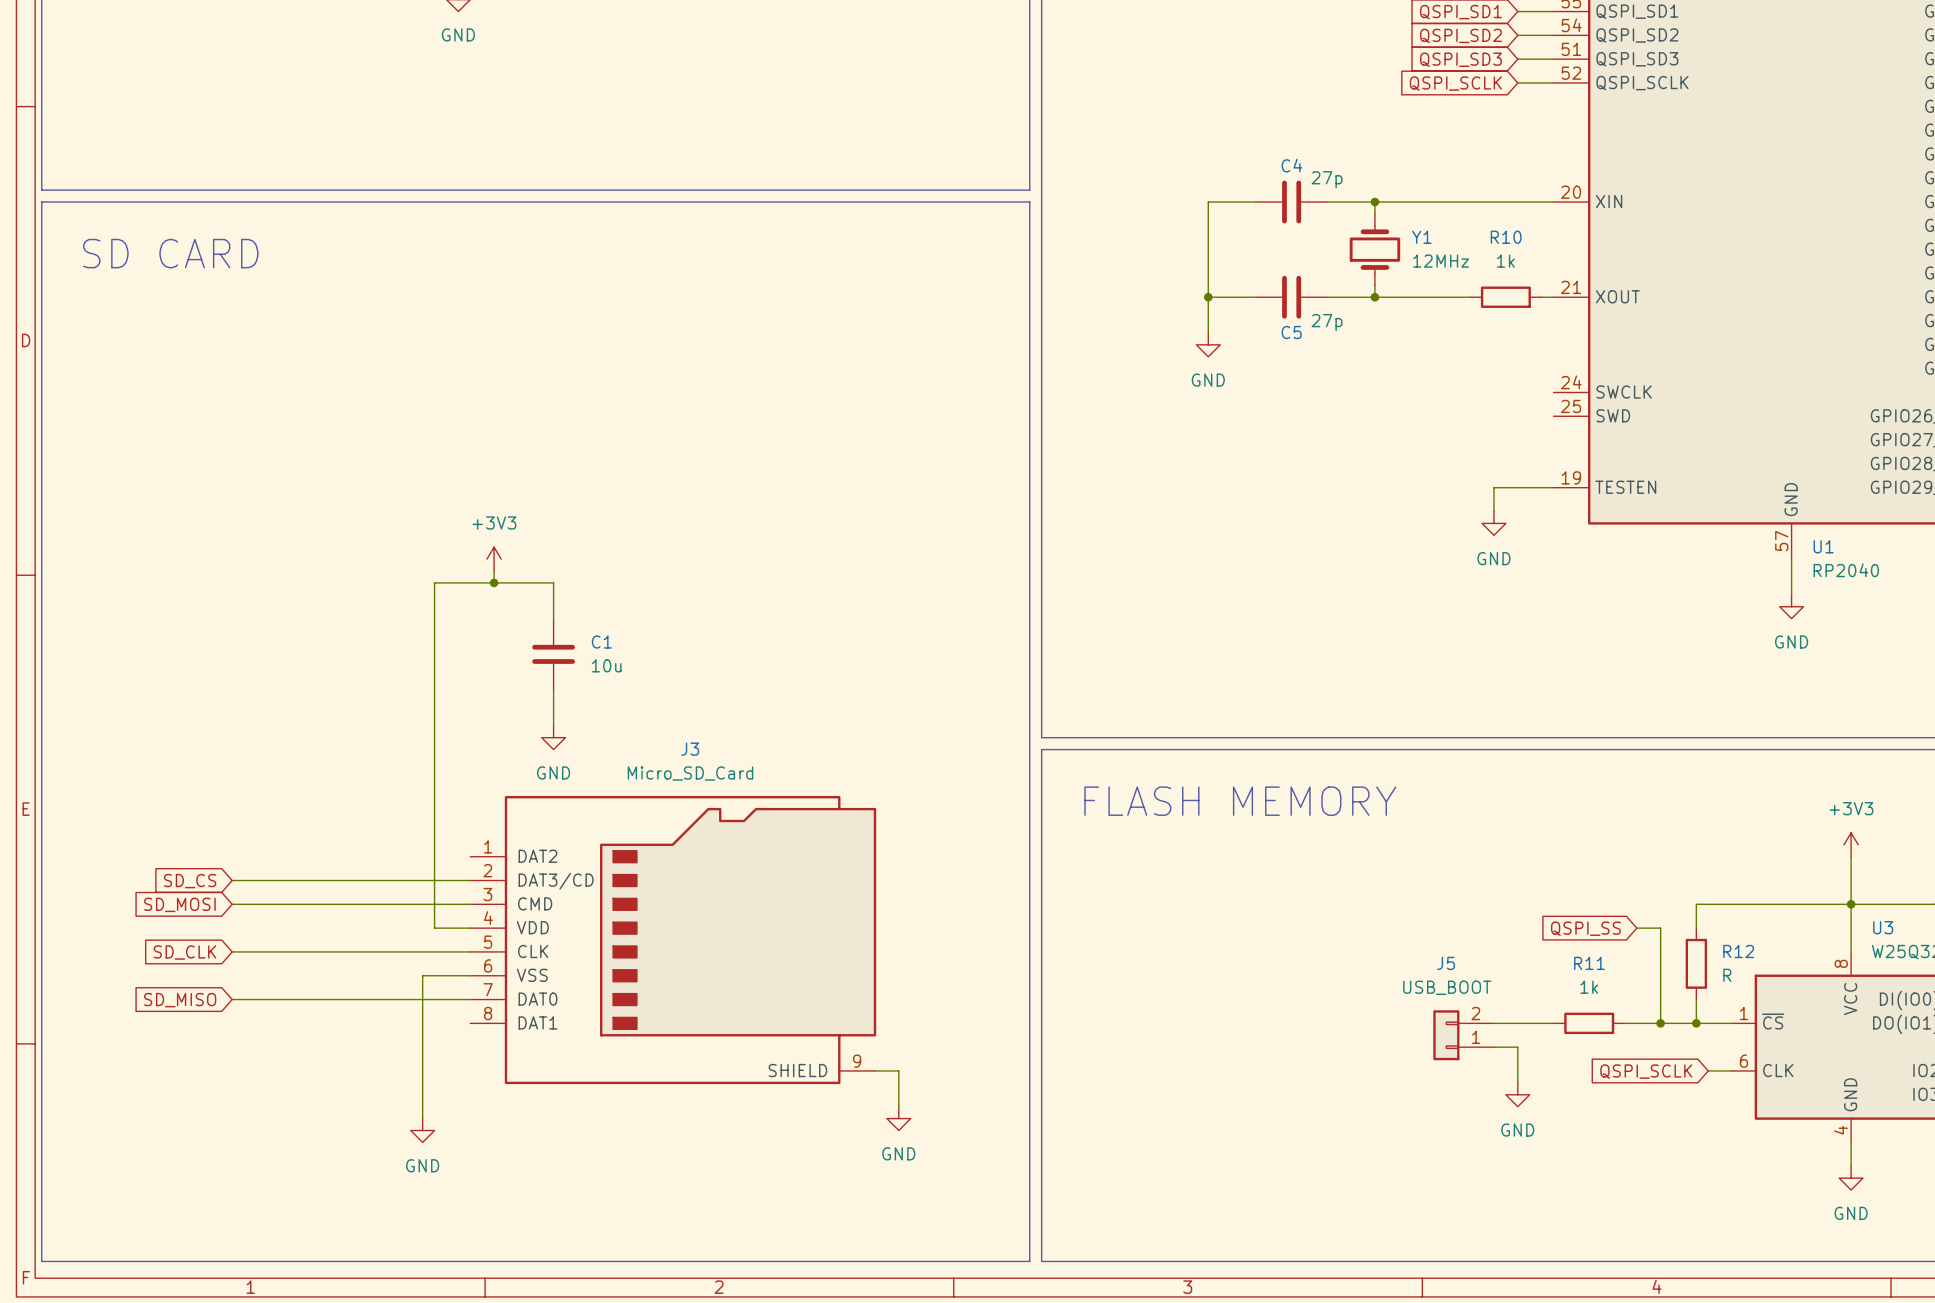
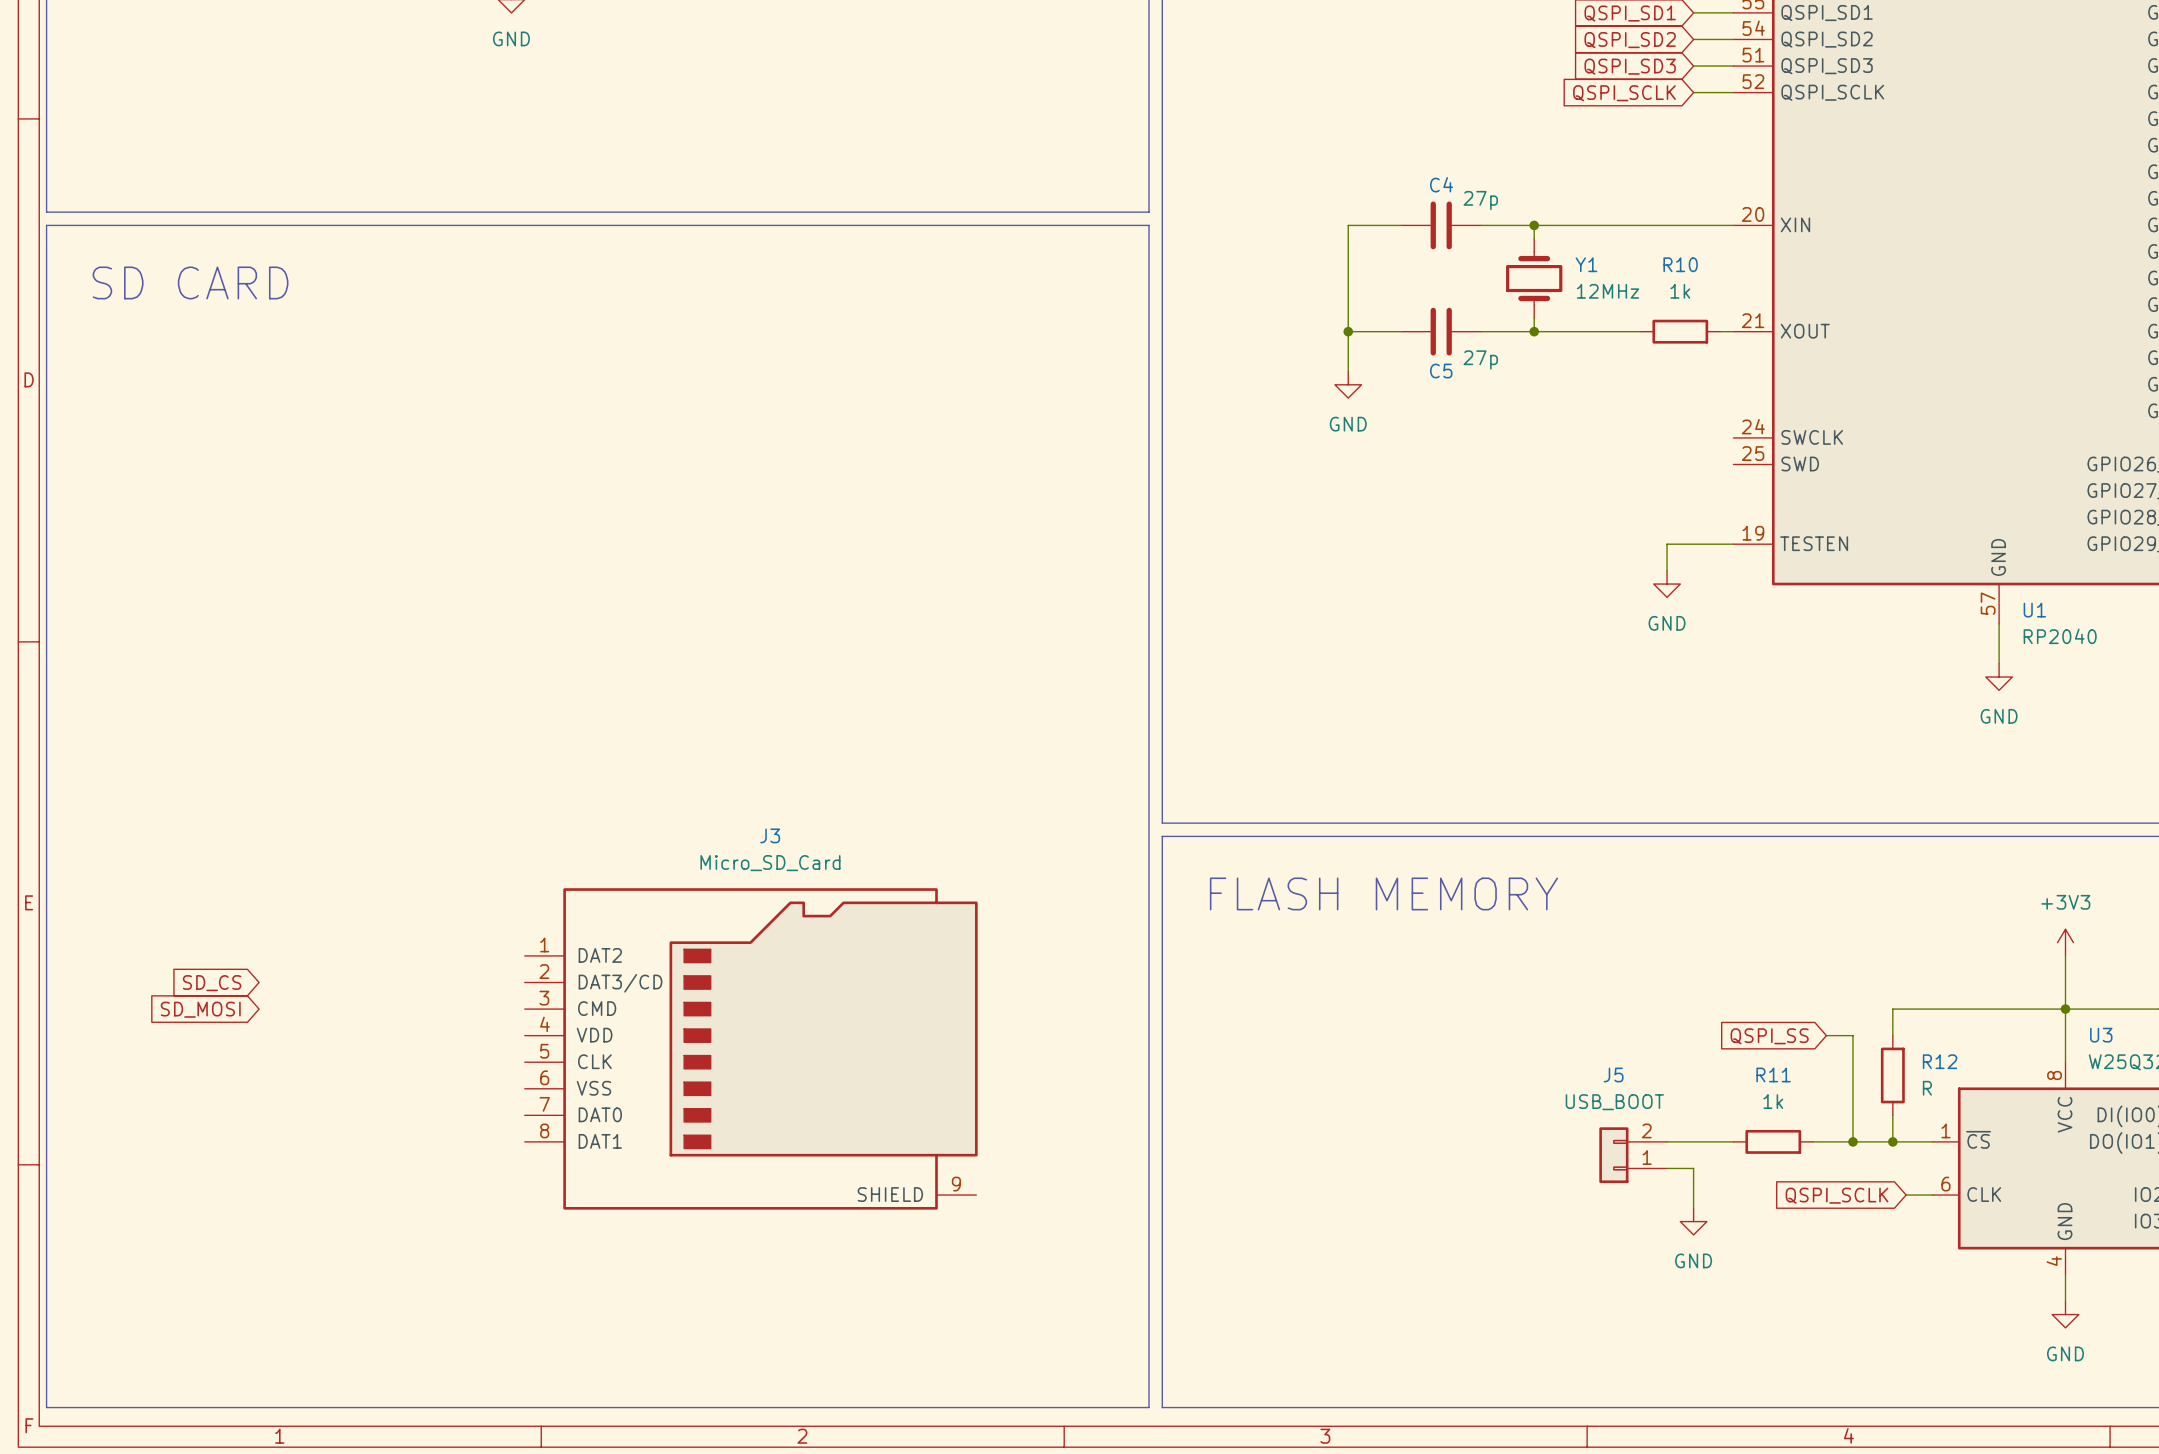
power symbol: +3V3 (494, 559) -> none
wire: (494, 571) (494, 582) -> none
junction: (494, 582) -> none
wire: (553, 618) (553, 582) (434, 582) (434, 928) (470, 928) -> none
C1: 10u (553, 654) -> none
wire: (553, 690) (553, 725) -> none
power symbol: GND (553, 737) -> none
wire: (232, 880) (470, 880) -> none
wire: (232, 904) (470, 904) -> none
wire: (232, 951) (470, 951) -> none
global label: SD_CLK (184, 952) -> none
wire: (470, 975) (422, 975) (422, 1118) -> none
wire: (232, 999) (470, 999) -> none
global label: SD_MISO (180, 1000) -> none
wire: (874, 1070) (898, 1070) (898, 1106) -> none
power symbol: GND (898, 1118) -> none
power symbol: GND (422, 1130) -> none

